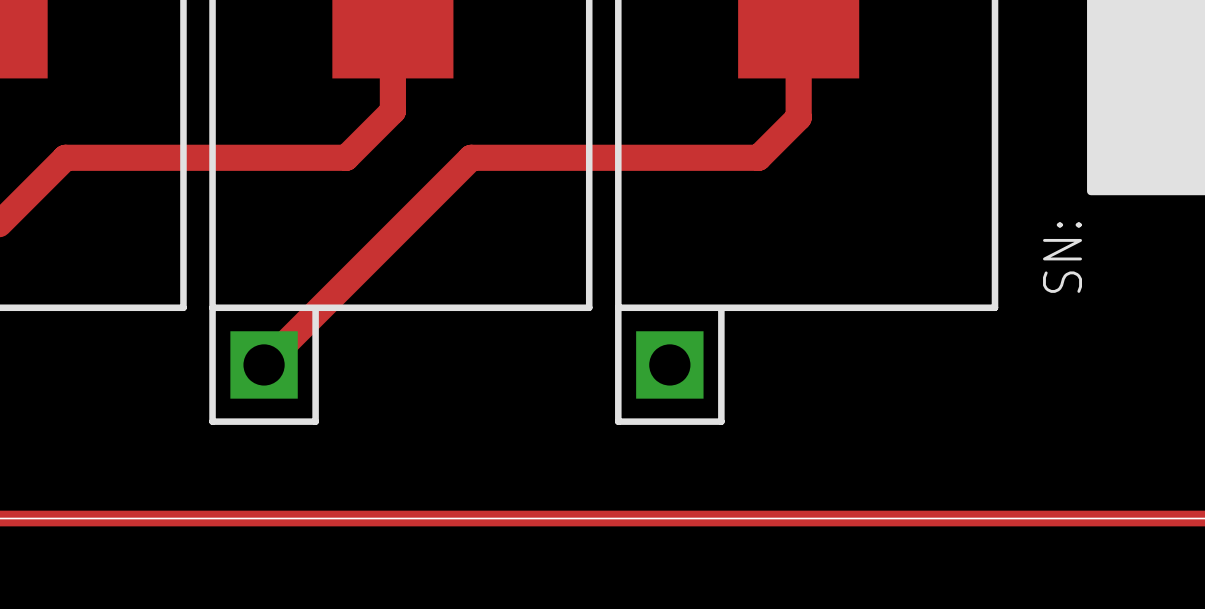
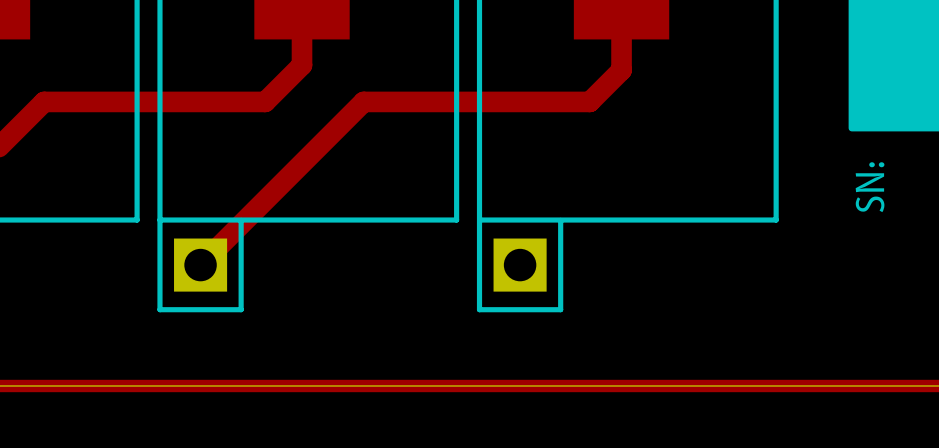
text position: SN: (1062, 257) -> SN: (870, 187)

